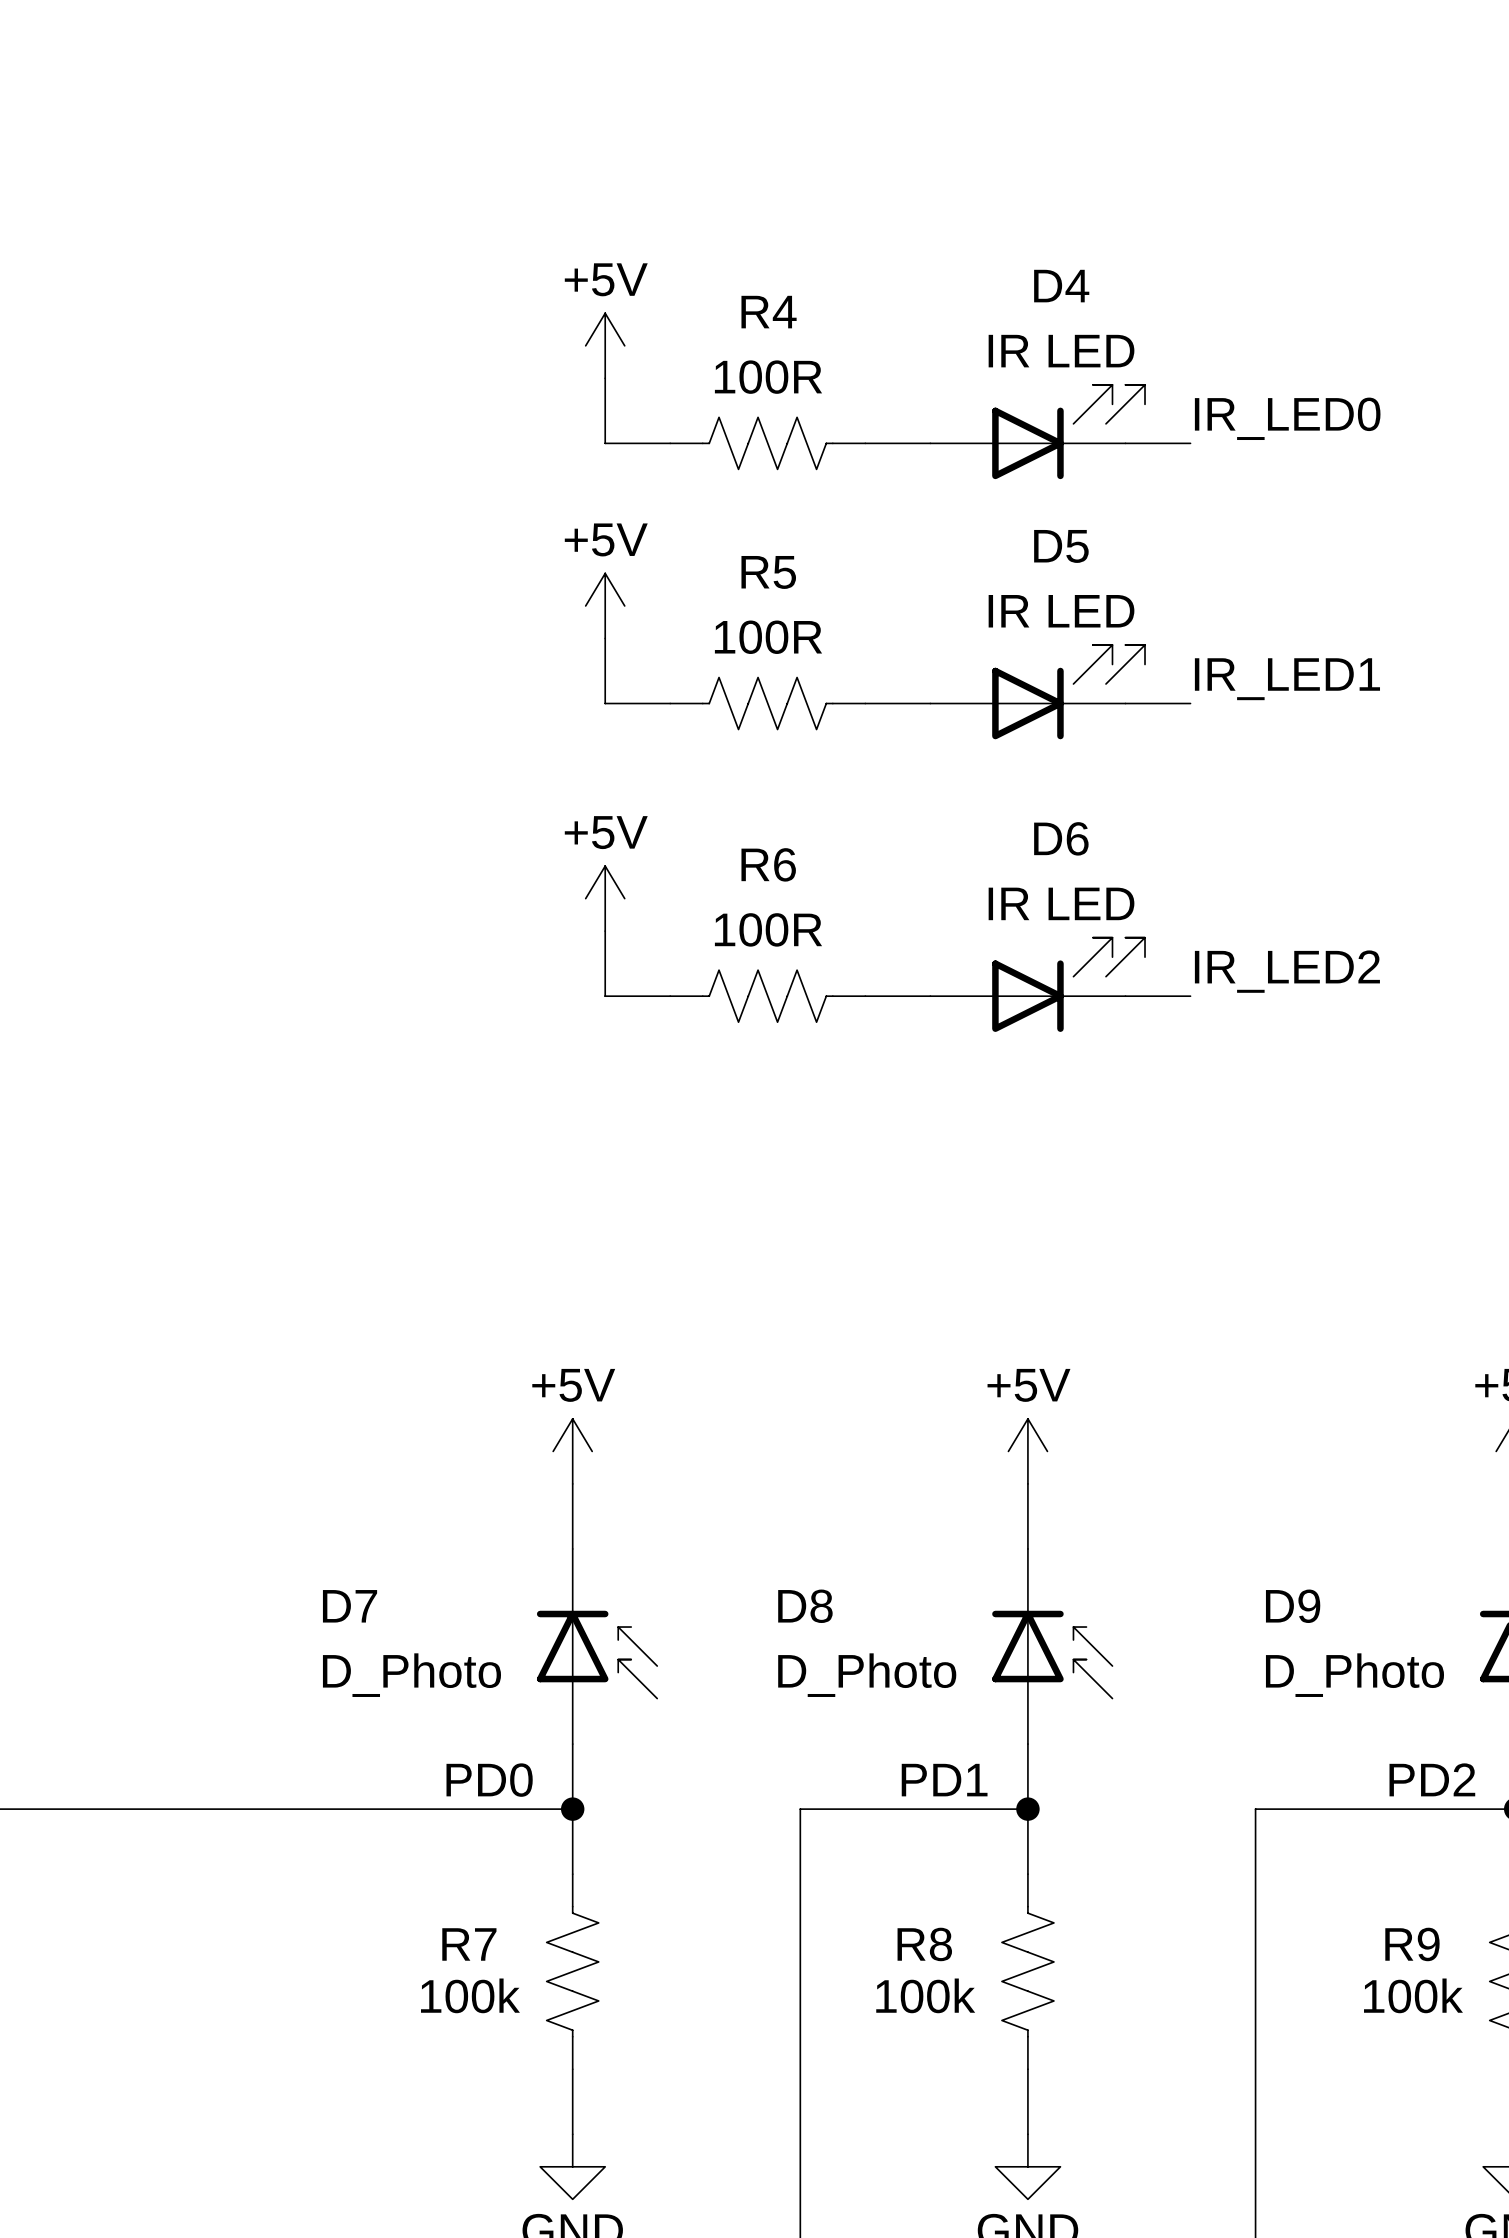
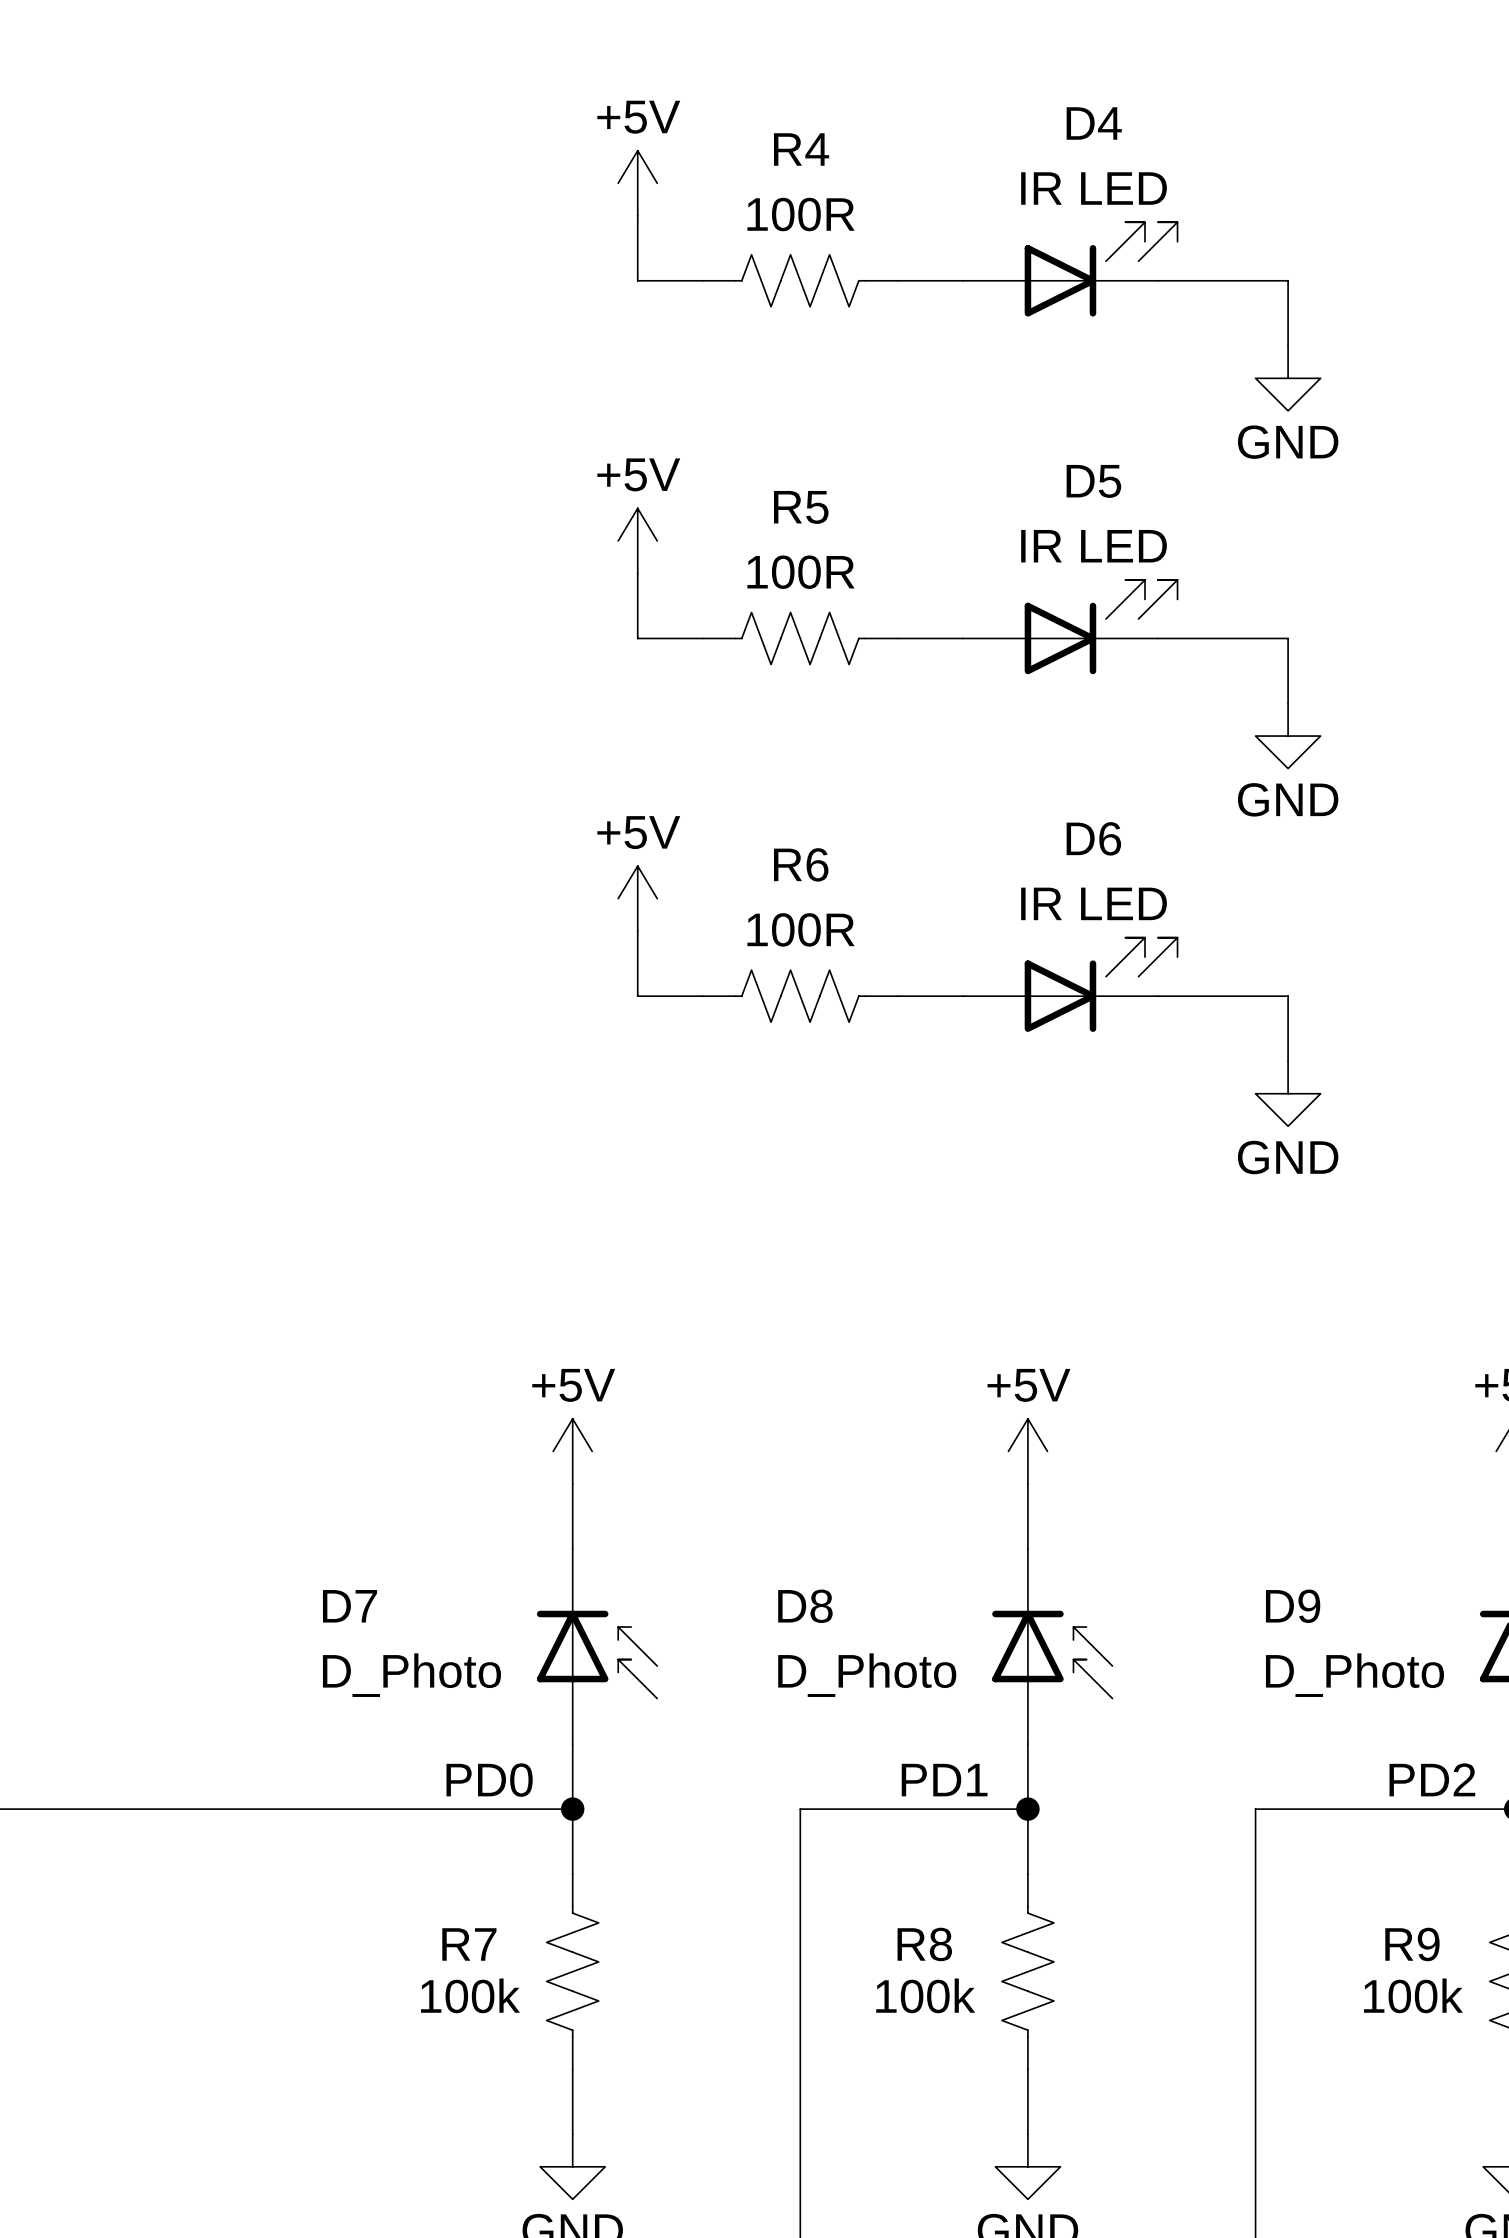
power symbol: none -> +5V (637, 183)
wire: none -> (1158, 280) (1288, 280) (1288, 345)
power symbol: +5V (605, 345) -> none
wire: (605, 378) (605, 443) (670, 443) -> (637, 215) (637, 280) (702, 280)
power symbol: none -> GND (1288, 378)
label: IR_LED0 (1287, 418) -> none
D4 position: (1037, 431) -> (1070, 269)
R4 position: (767, 443) -> (800, 280)
wire: (865, 443) (930, 443) -> (897, 280) (962, 280)
wire: (1125, 443) (1190, 443) -> none
power symbol position: +5V (605, 605) -> +5V (637, 540)
wire: (605, 638) (605, 703) (670, 703) -> (637, 573) (637, 638) (702, 638)
wire: none -> (1158, 638) (1288, 638) (1288, 703)
label: IR_LED1 (1287, 679) -> none
D5 position: (1037, 692) -> (1070, 627)
R5 position: (767, 703) -> (800, 638)
wire: (865, 703) (930, 703) -> (897, 638) (962, 638)
wire: (1125, 703) (1190, 703) -> none
power symbol: none -> GND (1288, 736)
power symbol position: +5V (605, 898) -> +5V (637, 898)
wire: (605, 931) (605, 996) (637, 996) -> (637, 931) (637, 996)
label: IR_LED2 (1287, 971) -> none
D6 position: (1037, 984) -> (1070, 984)
R6 position: (767, 996) -> (800, 996)
wire: none -> (1190, 996) (1288, 996) (1288, 1061)
power symbol: none -> GND (1288, 1093)

